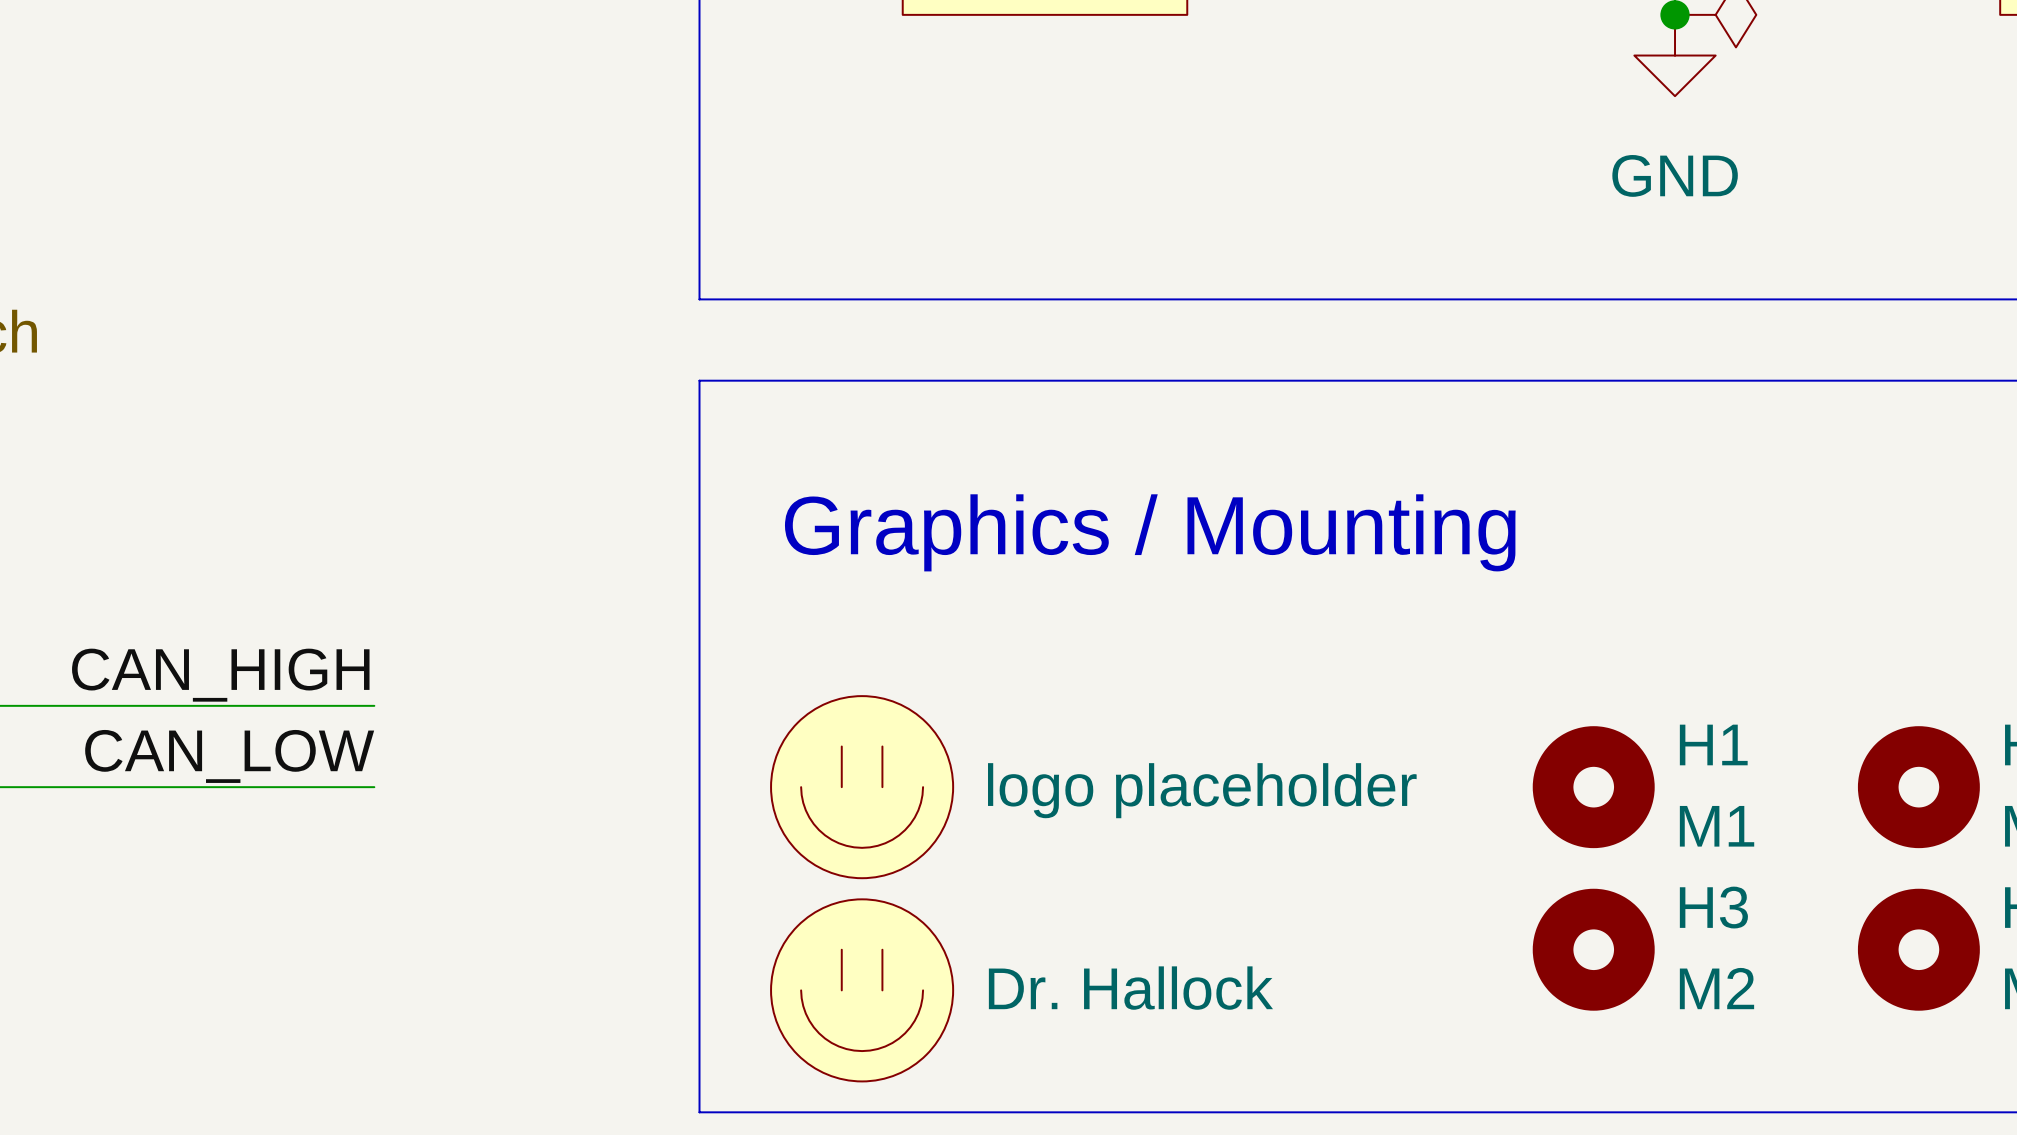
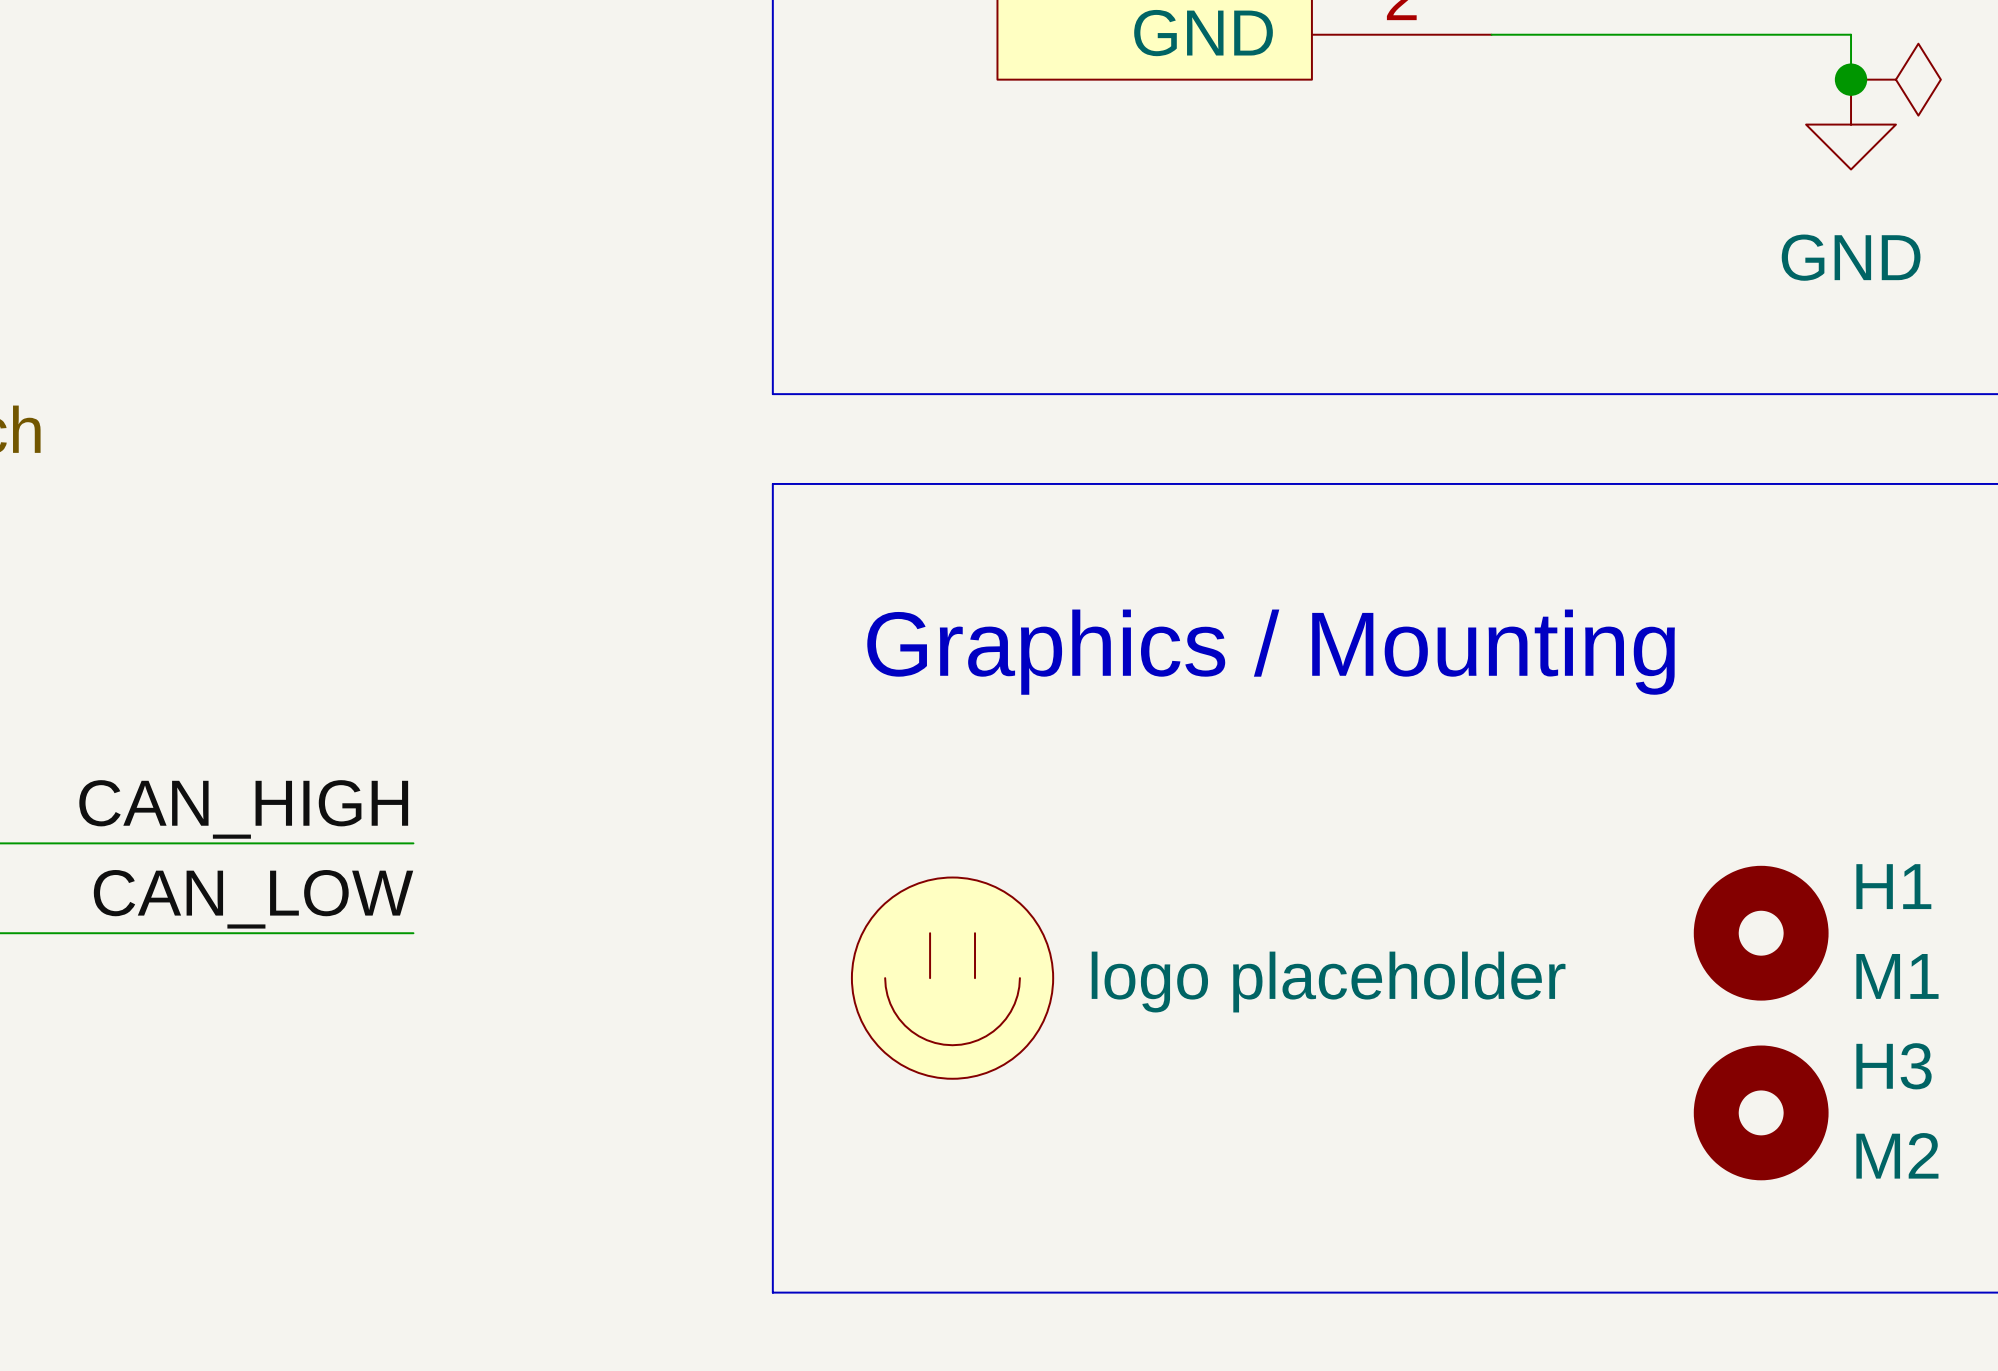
part position: (862, 787) -> (952, 978)
part: Dr. Hallock (862, 990) -> none

